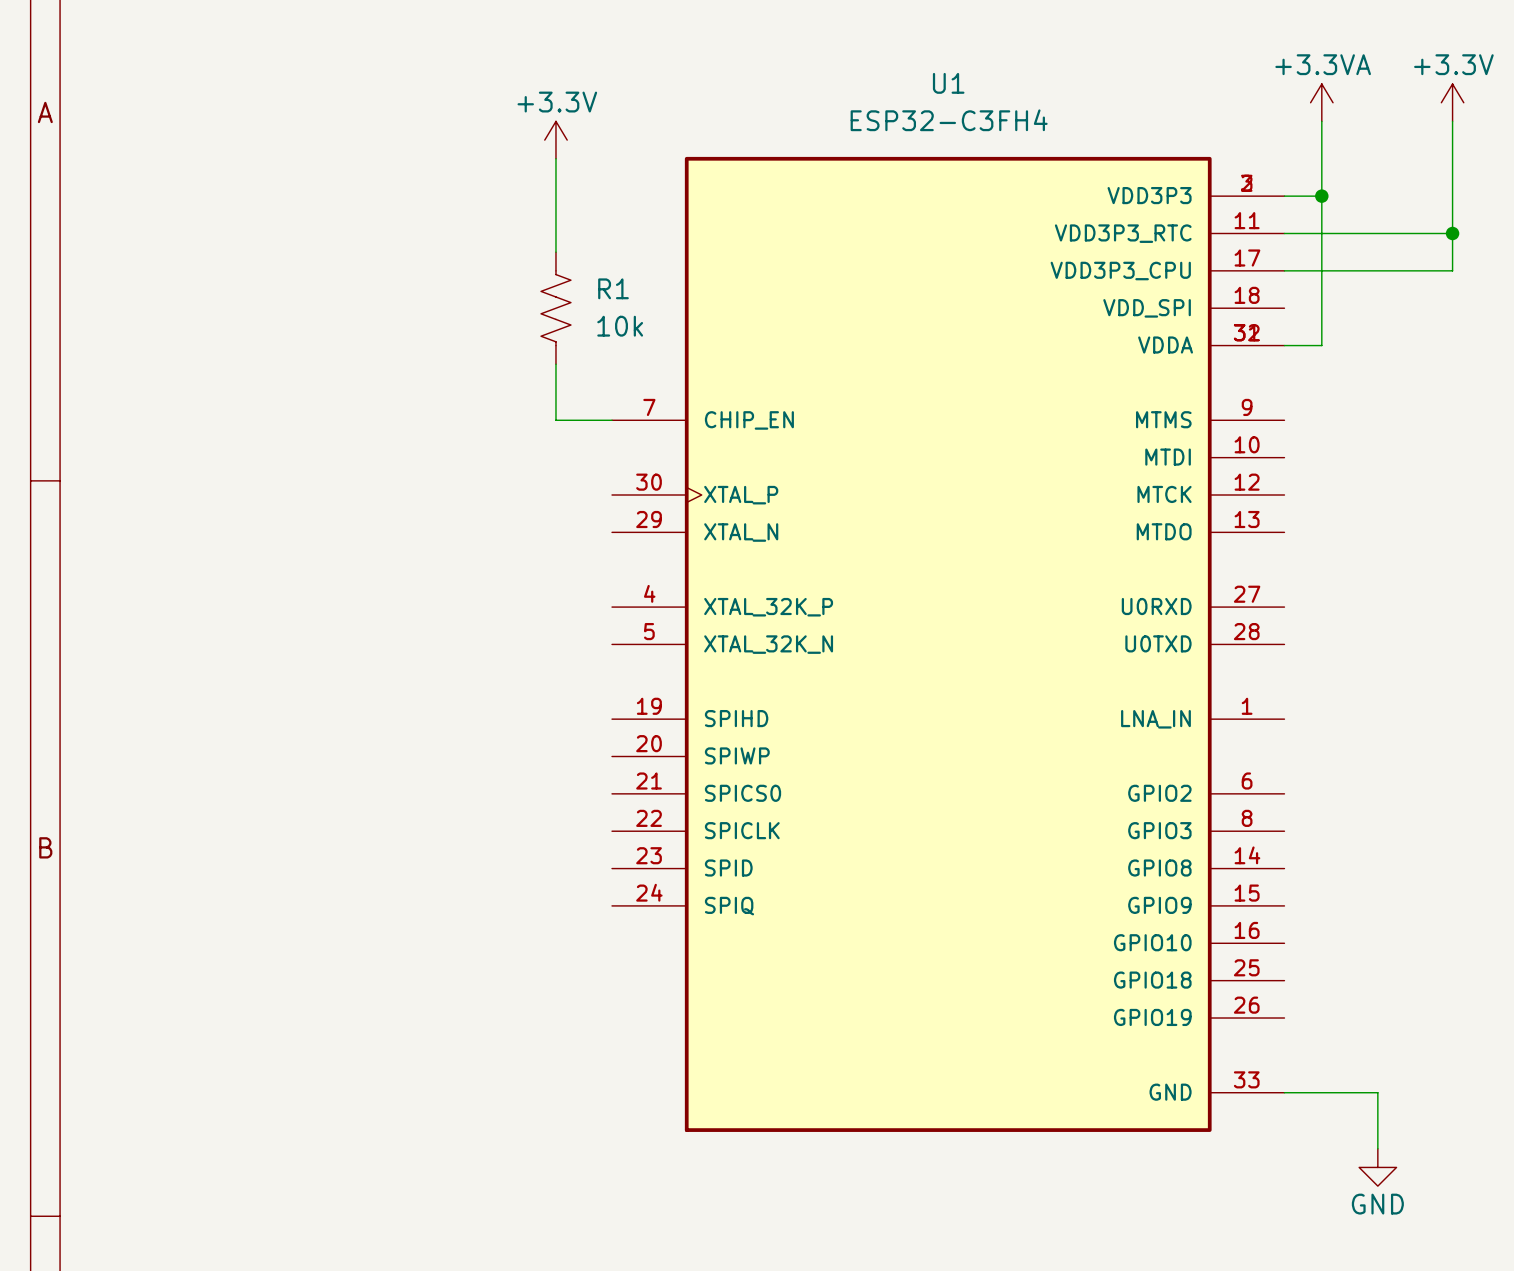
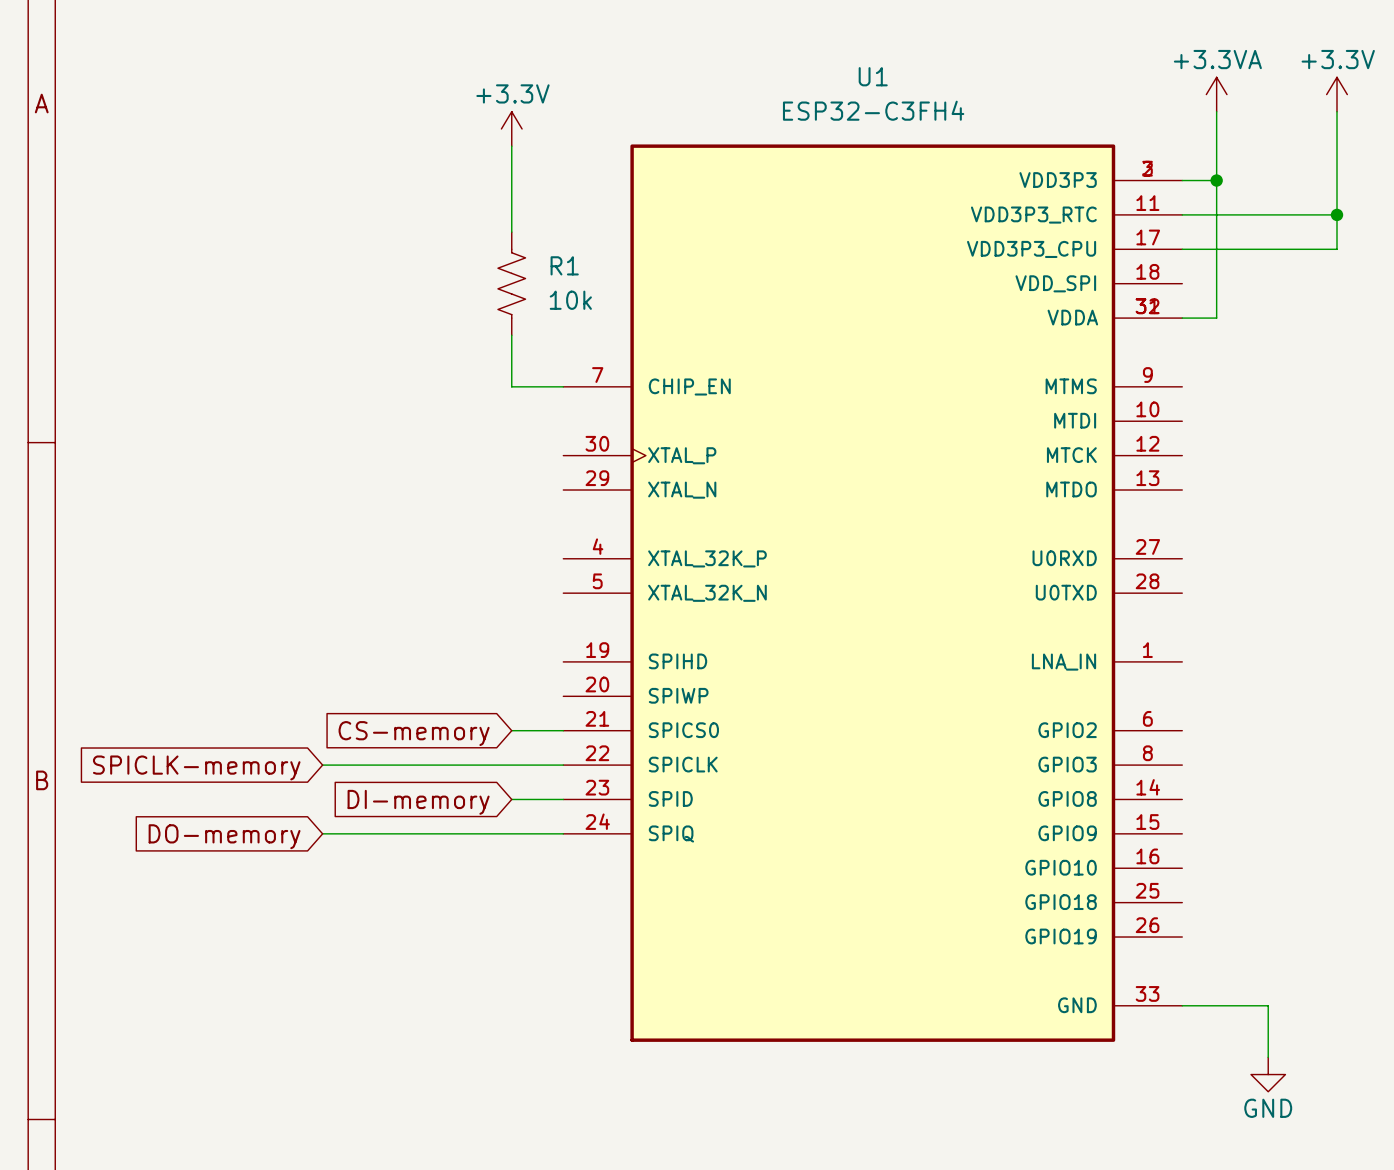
wire: none -> (511, 730) (563, 730)
global label: none -> CS-memory (414, 733)
wire: none -> (322, 765) (563, 765)
global label: none -> SPICLK-memory (196, 767)
wire: none -> (511, 799) (563, 799)
global label: none -> DI-memory (418, 802)
wire: none -> (322, 833) (563, 833)
global label: none -> DO-memory (224, 836)

